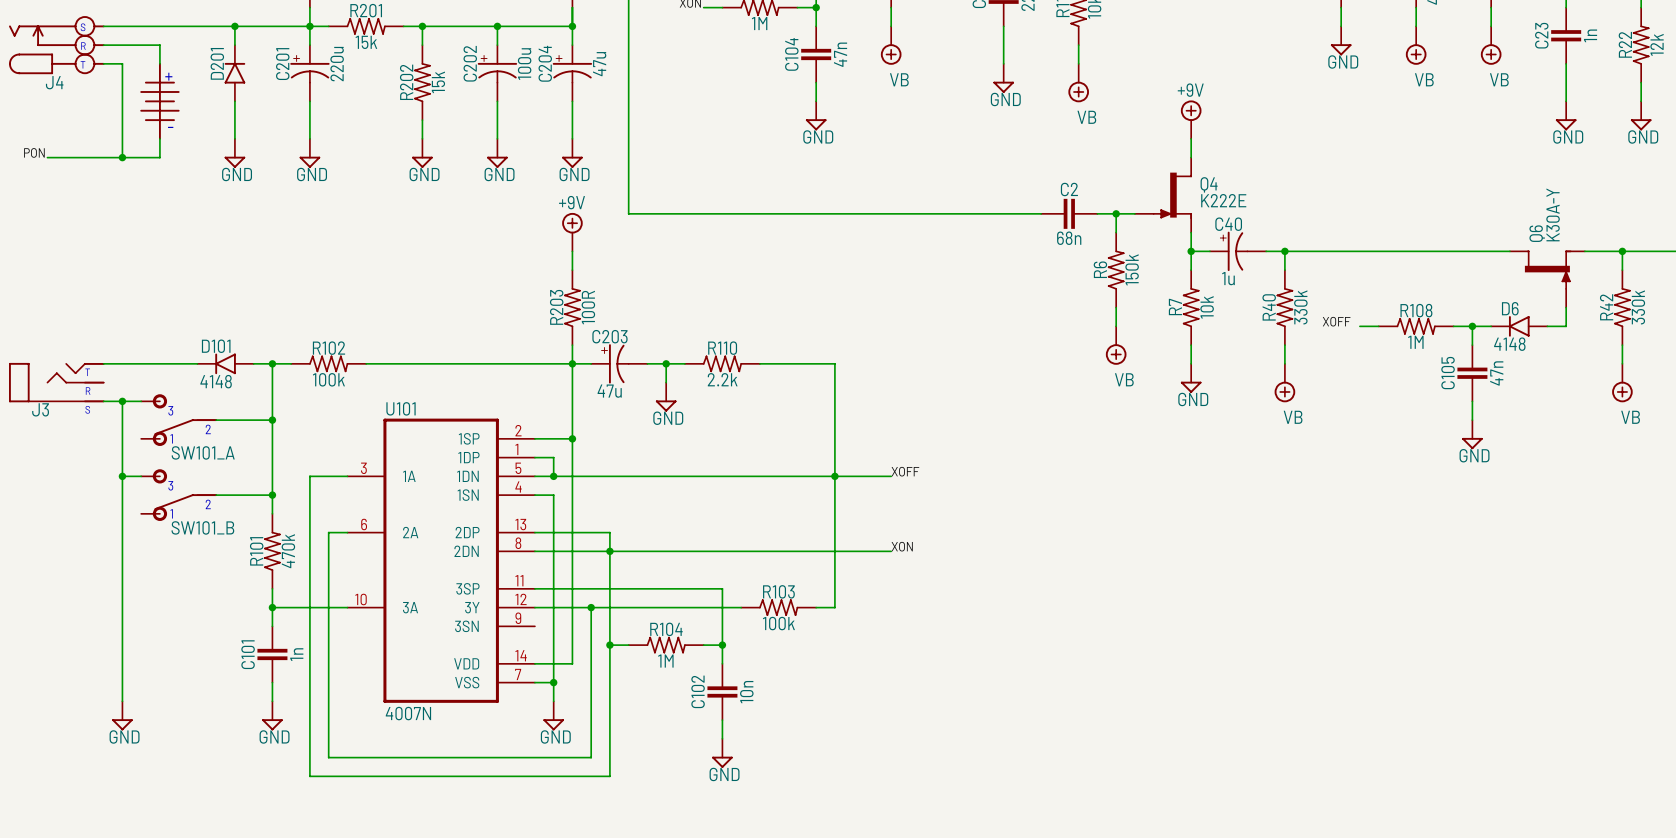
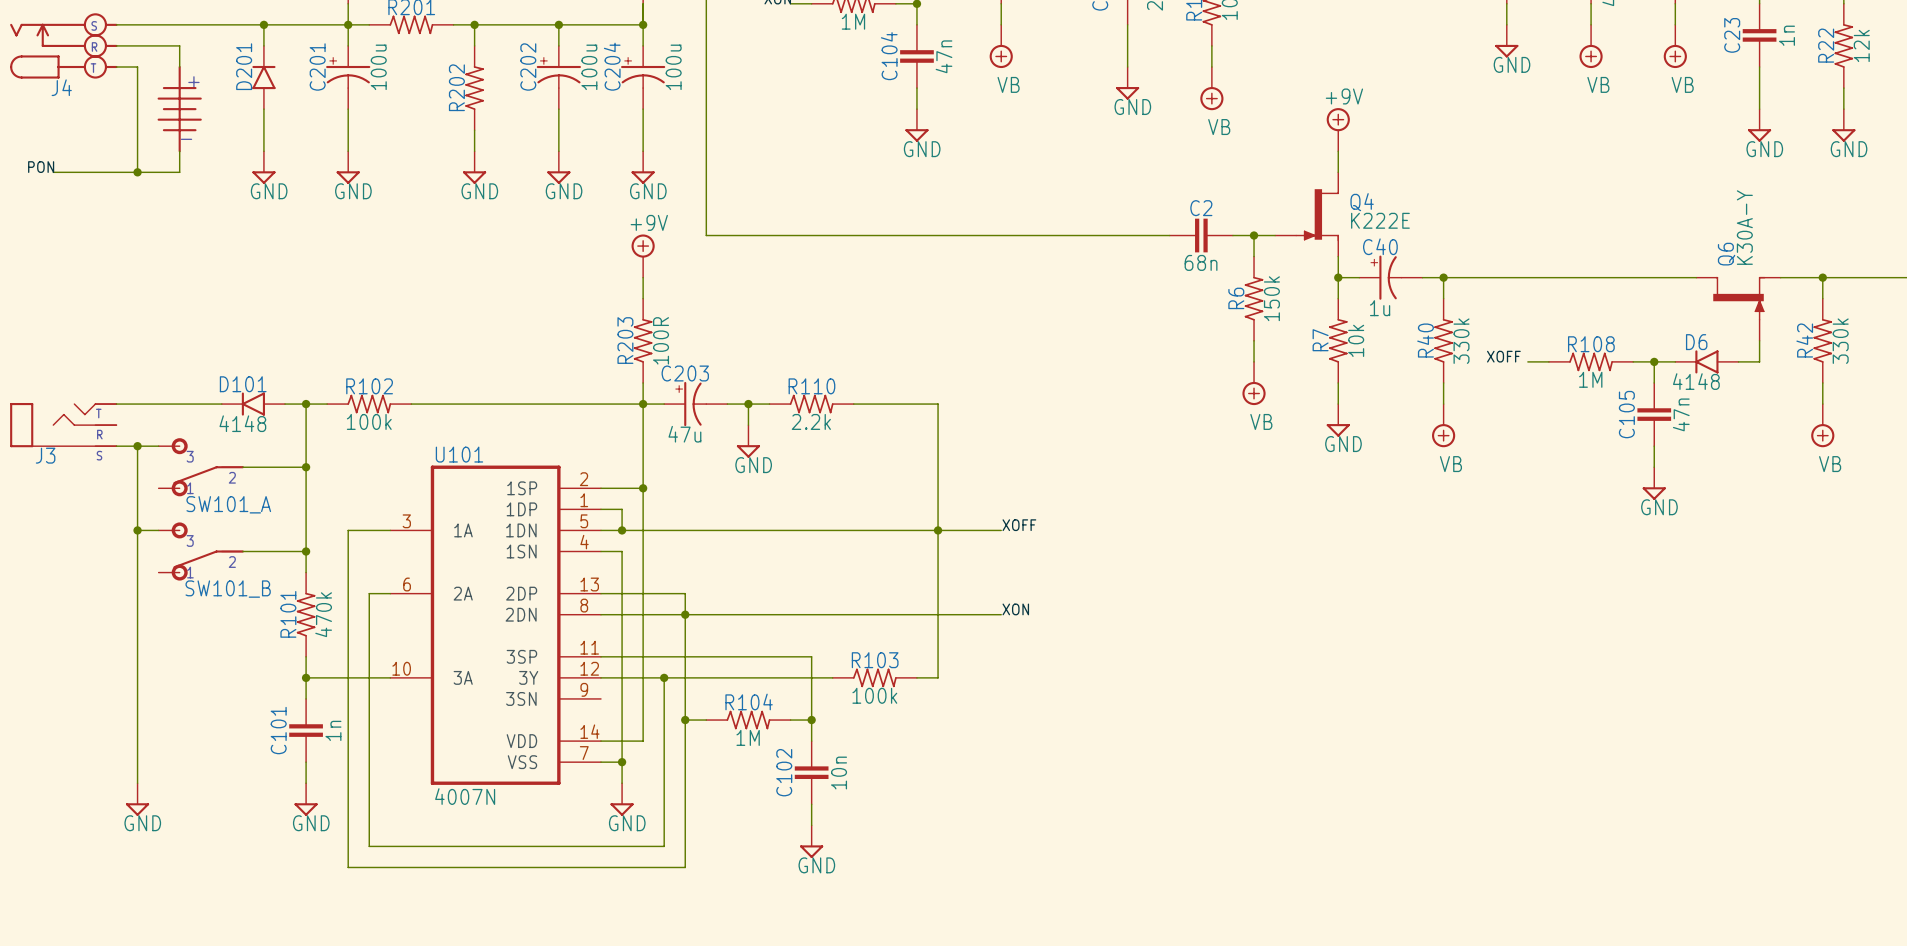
R201 value: 15k (366, 42) -> none
C201 value: 220u (337, 64) -> 100u (378, 67)
C204 value: 47u (599, 64) -> 100u (673, 67)
R202 value: 15k (438, 82) -> none

